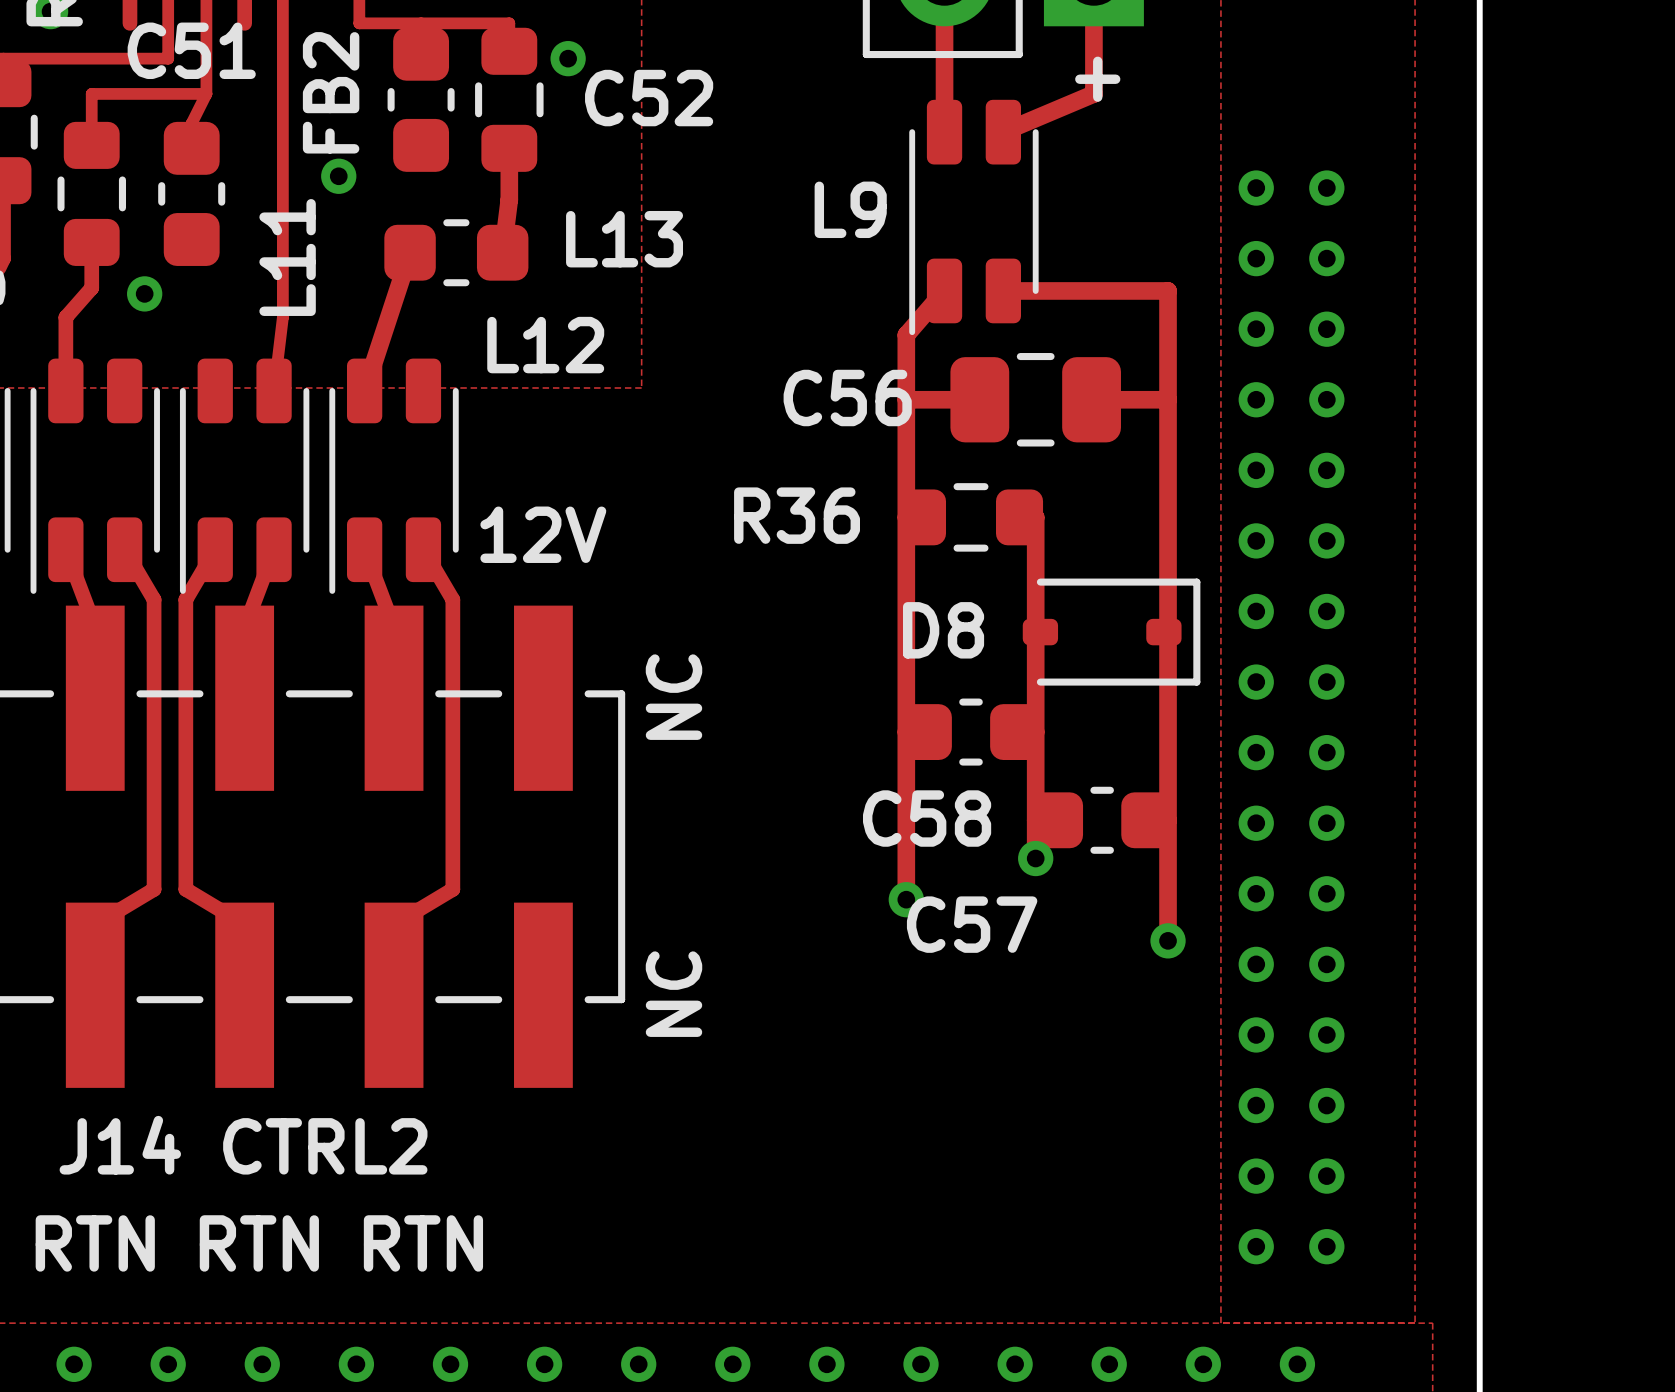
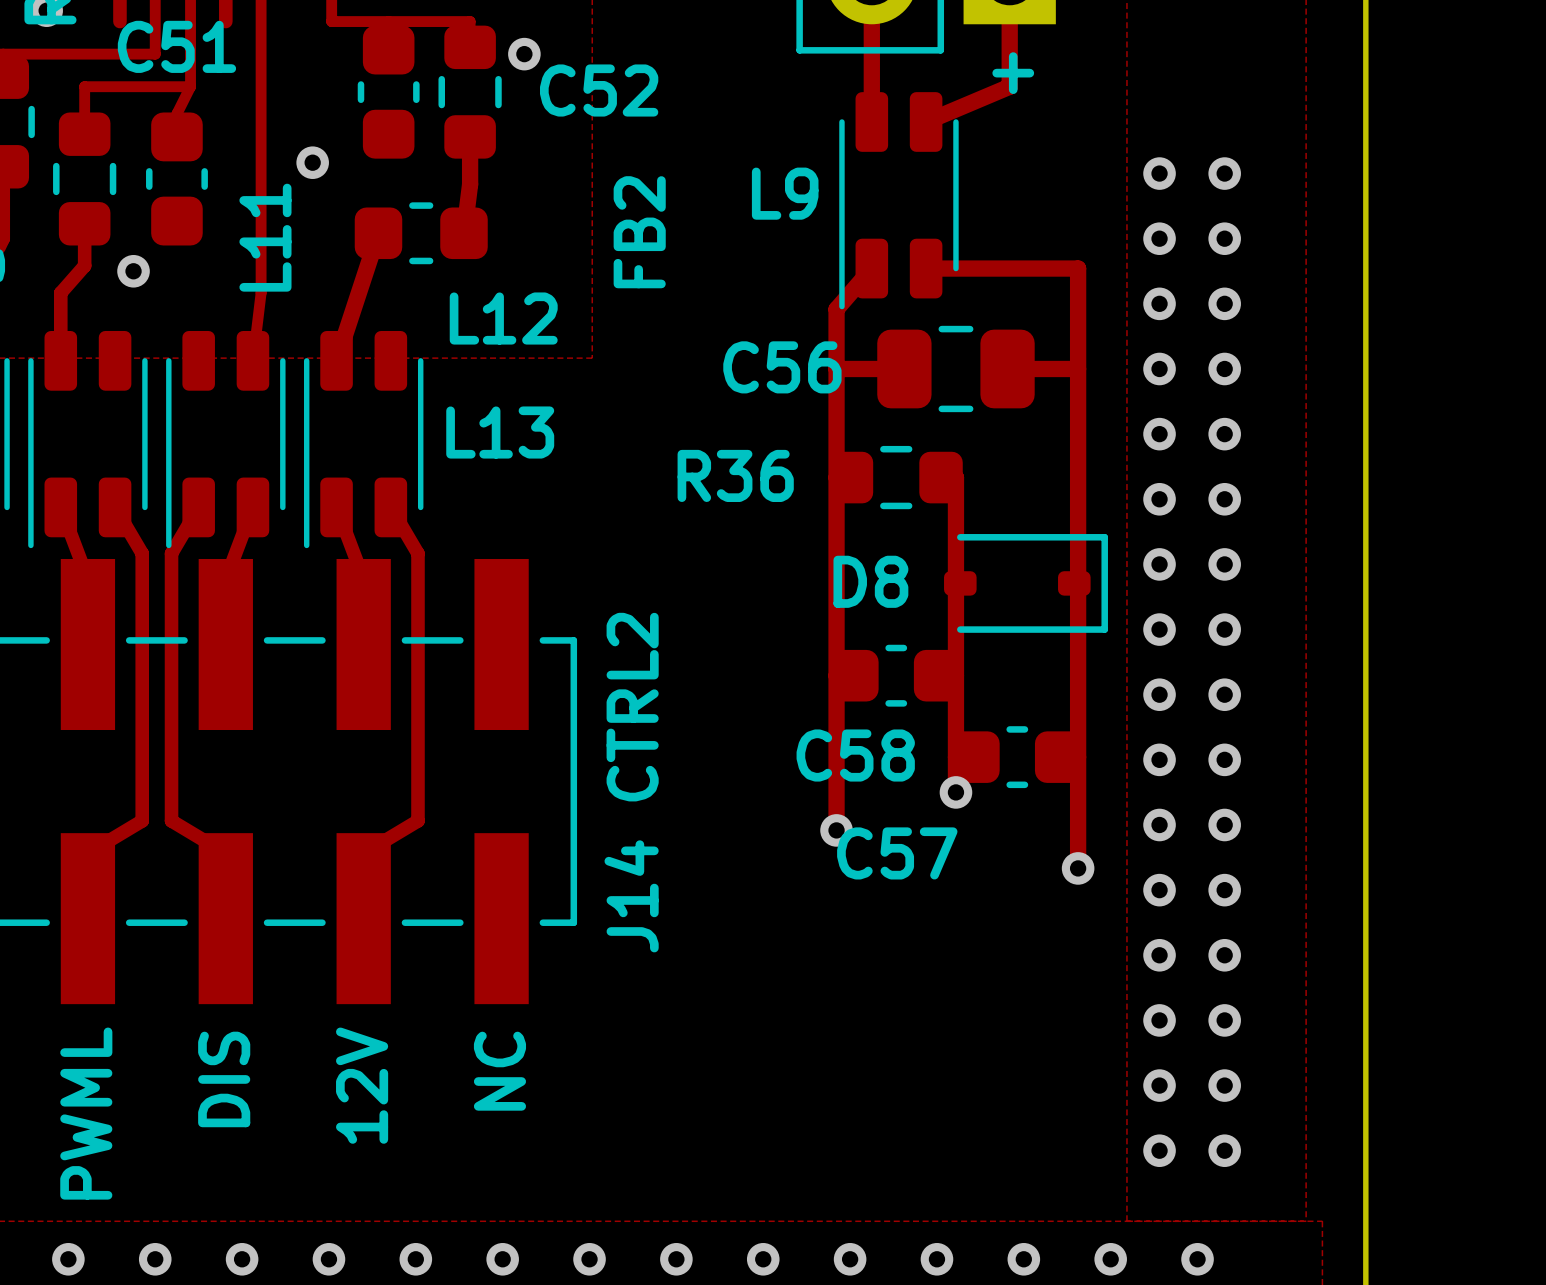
text position: FB2 (331, 92) -> FB2 (639, 232)
text position: L13 (624, 239) -> L13 (500, 432)
text rotation: 0° (543, 534) -> 90° counterclockwise (362, 1085)
text position: 12V (543, 534) -> 12V (362, 1085)
text: NC (674, 697) -> none
text: none -> J14 CTRL2 (631, 782)
text position: NC (674, 994) -> NC (499, 1071)
text: J14 CTRL2 (243, 1145) -> DIS (224, 1079)
text: RTN (95, 1243) -> PWML (86, 1113)
text: RTN (259, 1243) -> none
text: RTN (423, 1243) -> none

